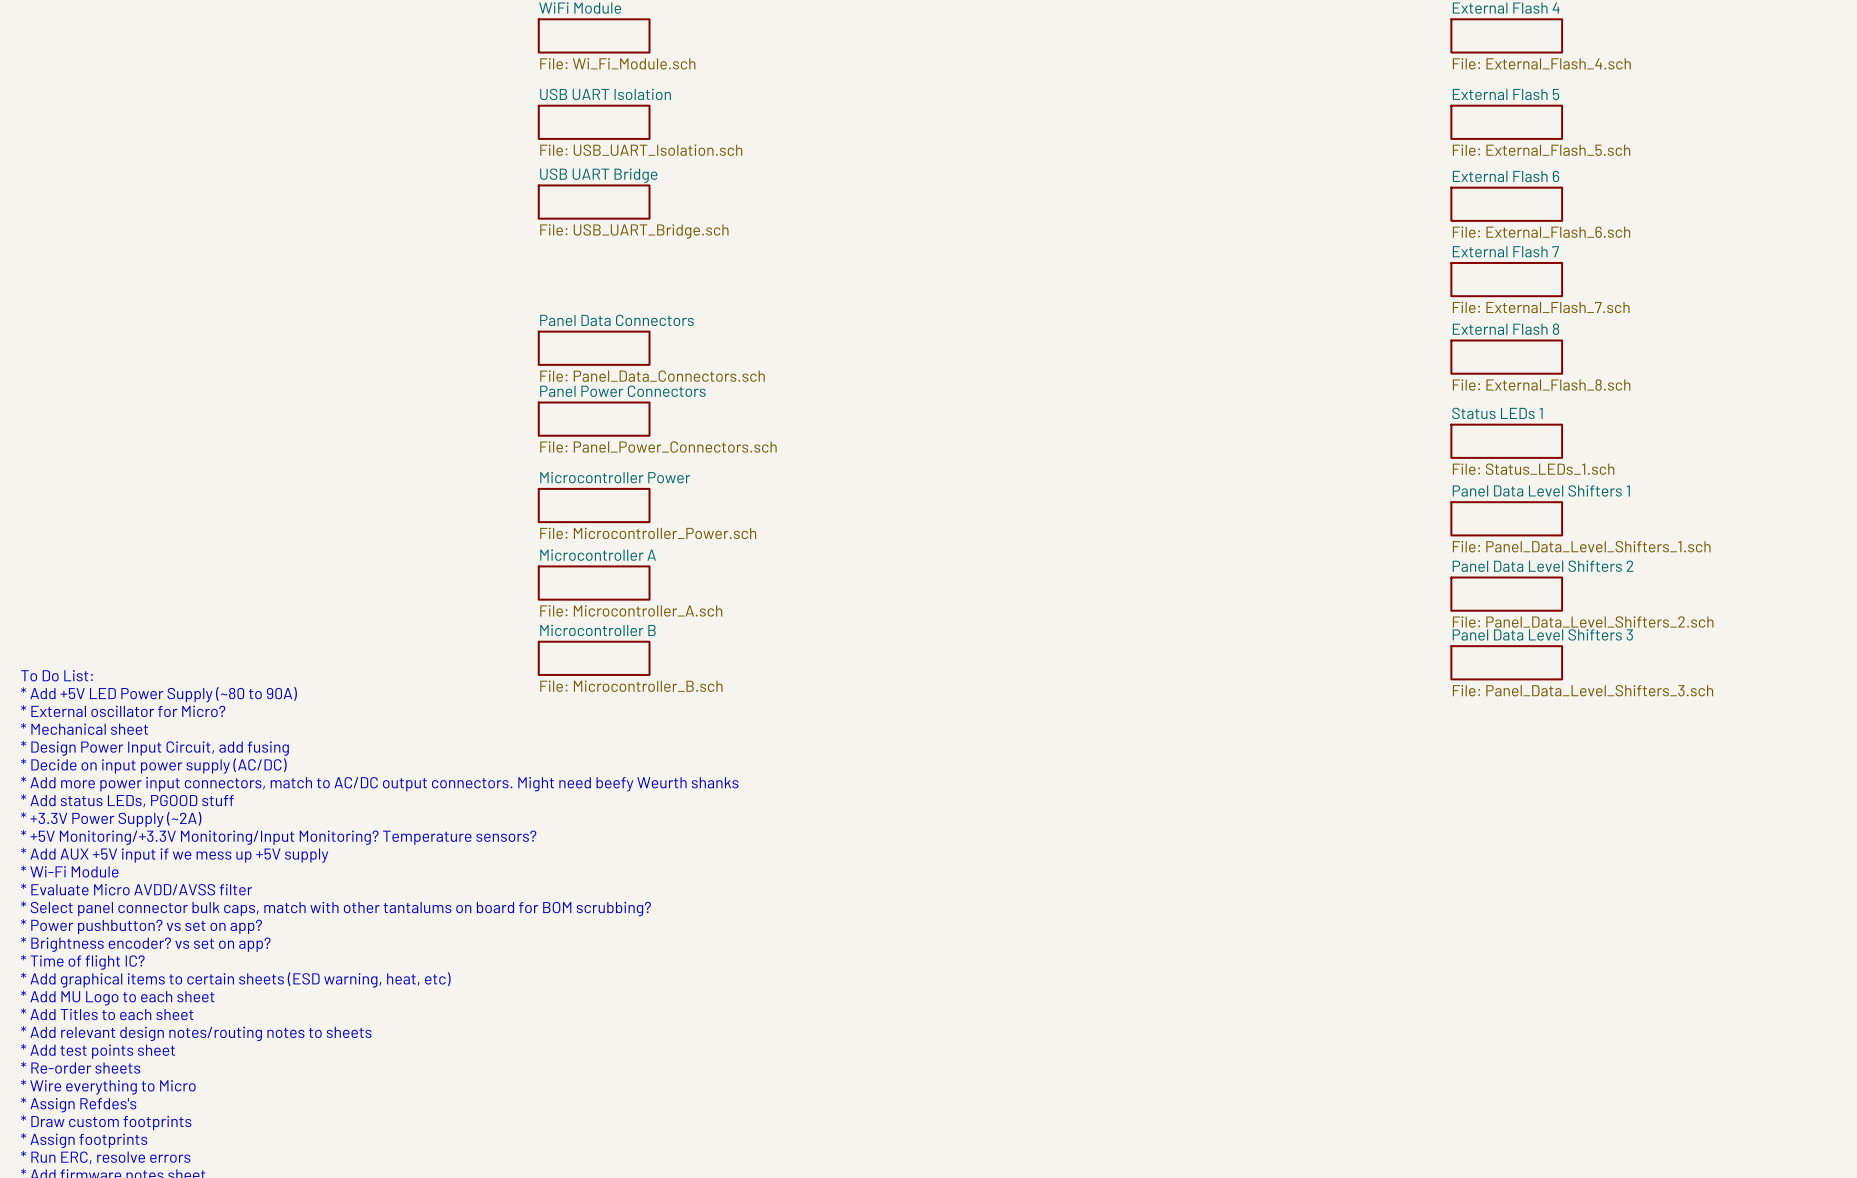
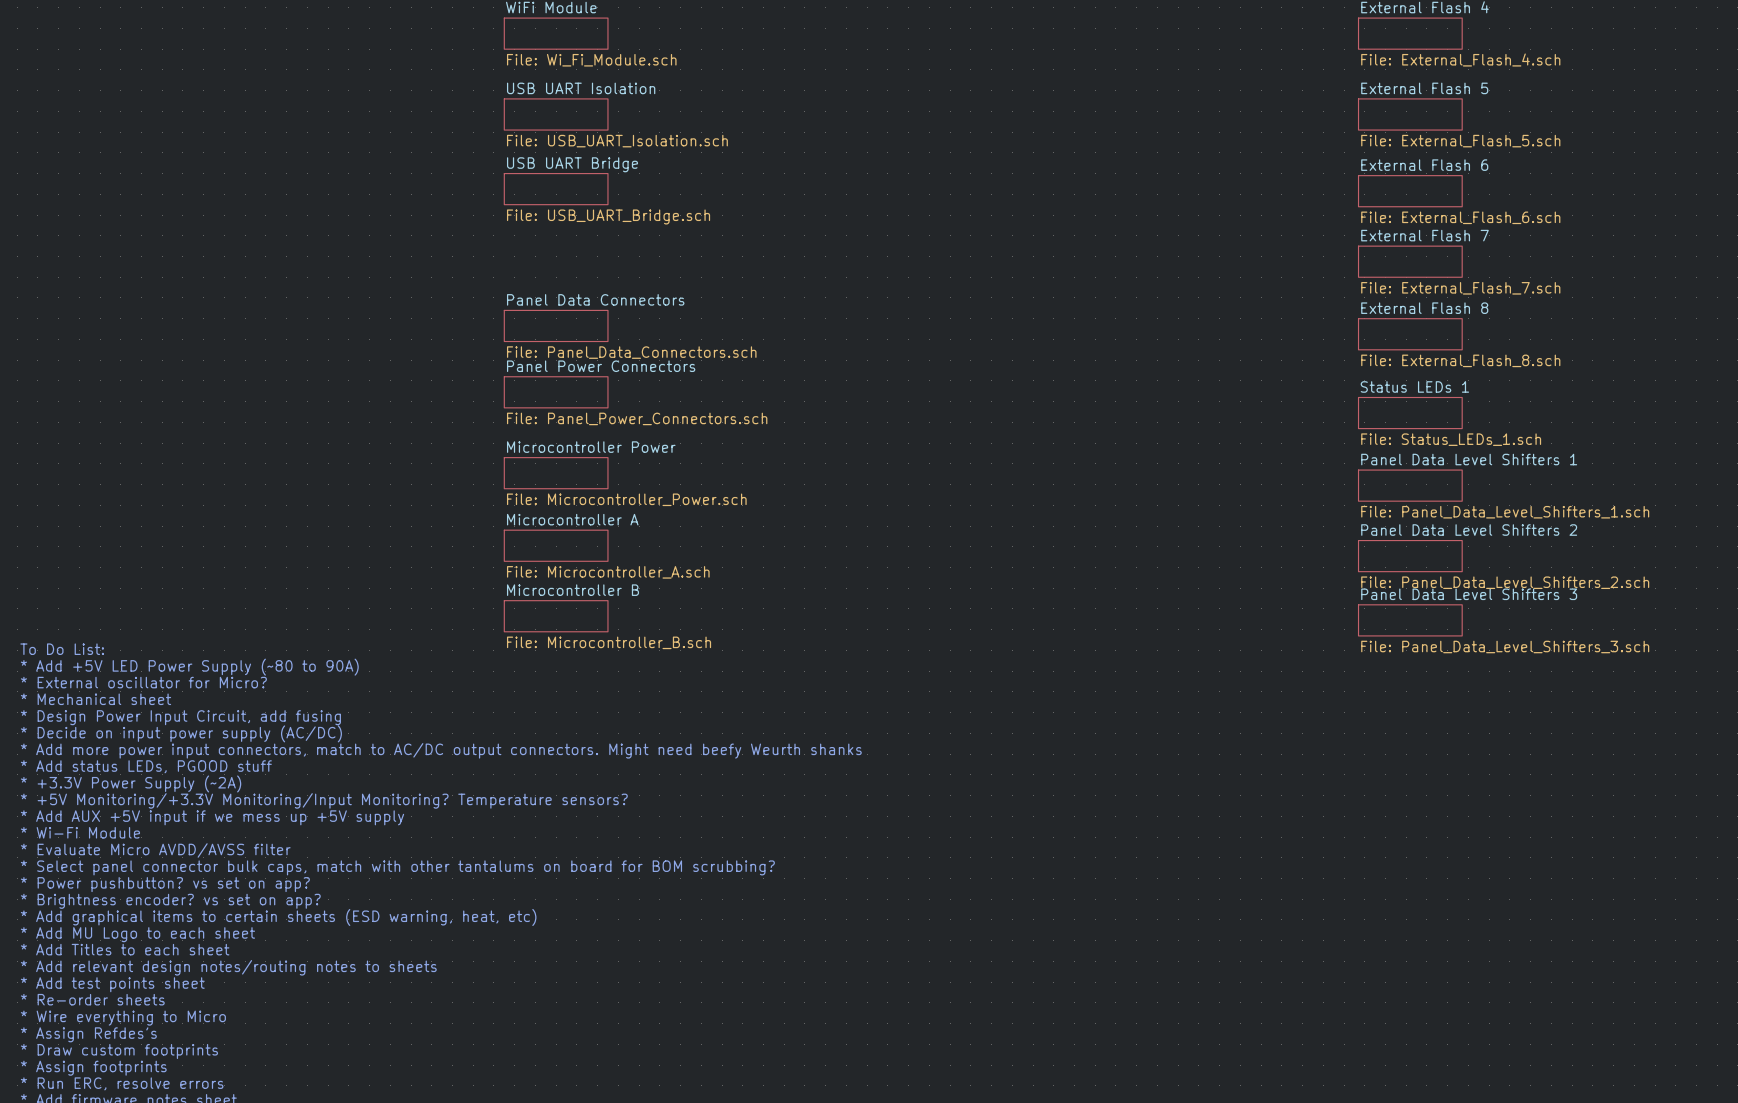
text: To Do List: (56, 675) -> none
text: * Add +5V LED Power Supply (~80 to 90A) (158, 694) -> To Do List: (62, 649)
text: * External oscillator for Micro? (123, 711) -> * Add +5V LED Power Supply (~80 to 90A) (189, 667)
text: * Mechanical sheet (84, 728) -> * External oscillator for Micro? (143, 682)
text: * Design Power Input Circuit, add fusing (154, 748) -> * Mechanical sheet (95, 699)
text: * Decide on input power supply (AC/DC) (153, 765) -> * Design Power Input Circuit, add fusing (180, 717)
text: * Add more power input connectors, match to AC/DC output connectors. Might need beefy Weurth shanks (379, 783) -> * Decide on input power supply (AC/DC) (181, 733)
text: * Add status LEDs, PGOOD stuff (127, 800) -> * Add more power input connectors, match to AC/DC output connectors. Might need beefy Weurth shanks (441, 750)
text: * +3.3V Power Supply (~2A) (111, 819) -> * Add status LEDs, PGOOD stuff (146, 766)
text: * +5V Monitoring/+3.3V Monitoring/Input Monitoring? Temperature sensors? (278, 837) -> * +3.3V Power Supply (~2A) (131, 783)
text: * Add AUX +5V input if we mess up +5V supply (174, 855) -> * +5V Monitoring/+3.3V Monitoring/Input Monitoring? Temperature sensors? (324, 800)
text: * Wi-Fi Module (69, 871) -> * Add AUX +5V input if we mess up +5V supply (212, 817)
text: * Evaluate Micro AVDD/AVSS filter (136, 889) -> * Wi-Fi Module (80, 832)
text: * Select panel connector bulk caps, match with other tantalums on board for BOM scrubbing? (335, 908) -> * Evaluate Micro AVDD/AVSS filter (155, 850)
text: * Power pushbutton? vs set on app? (141, 926) -> * Select panel connector bulk caps, match with other tantalums on board for BOM scrubbing? (397, 867)
text: * Brightness encoder? vs set on app? (145, 944) -> * Power pushbutton? vs set on app? (165, 884)
text: * Time of flight IC? (82, 962) -> * Brightness encoder? vs set on app? (170, 901)

